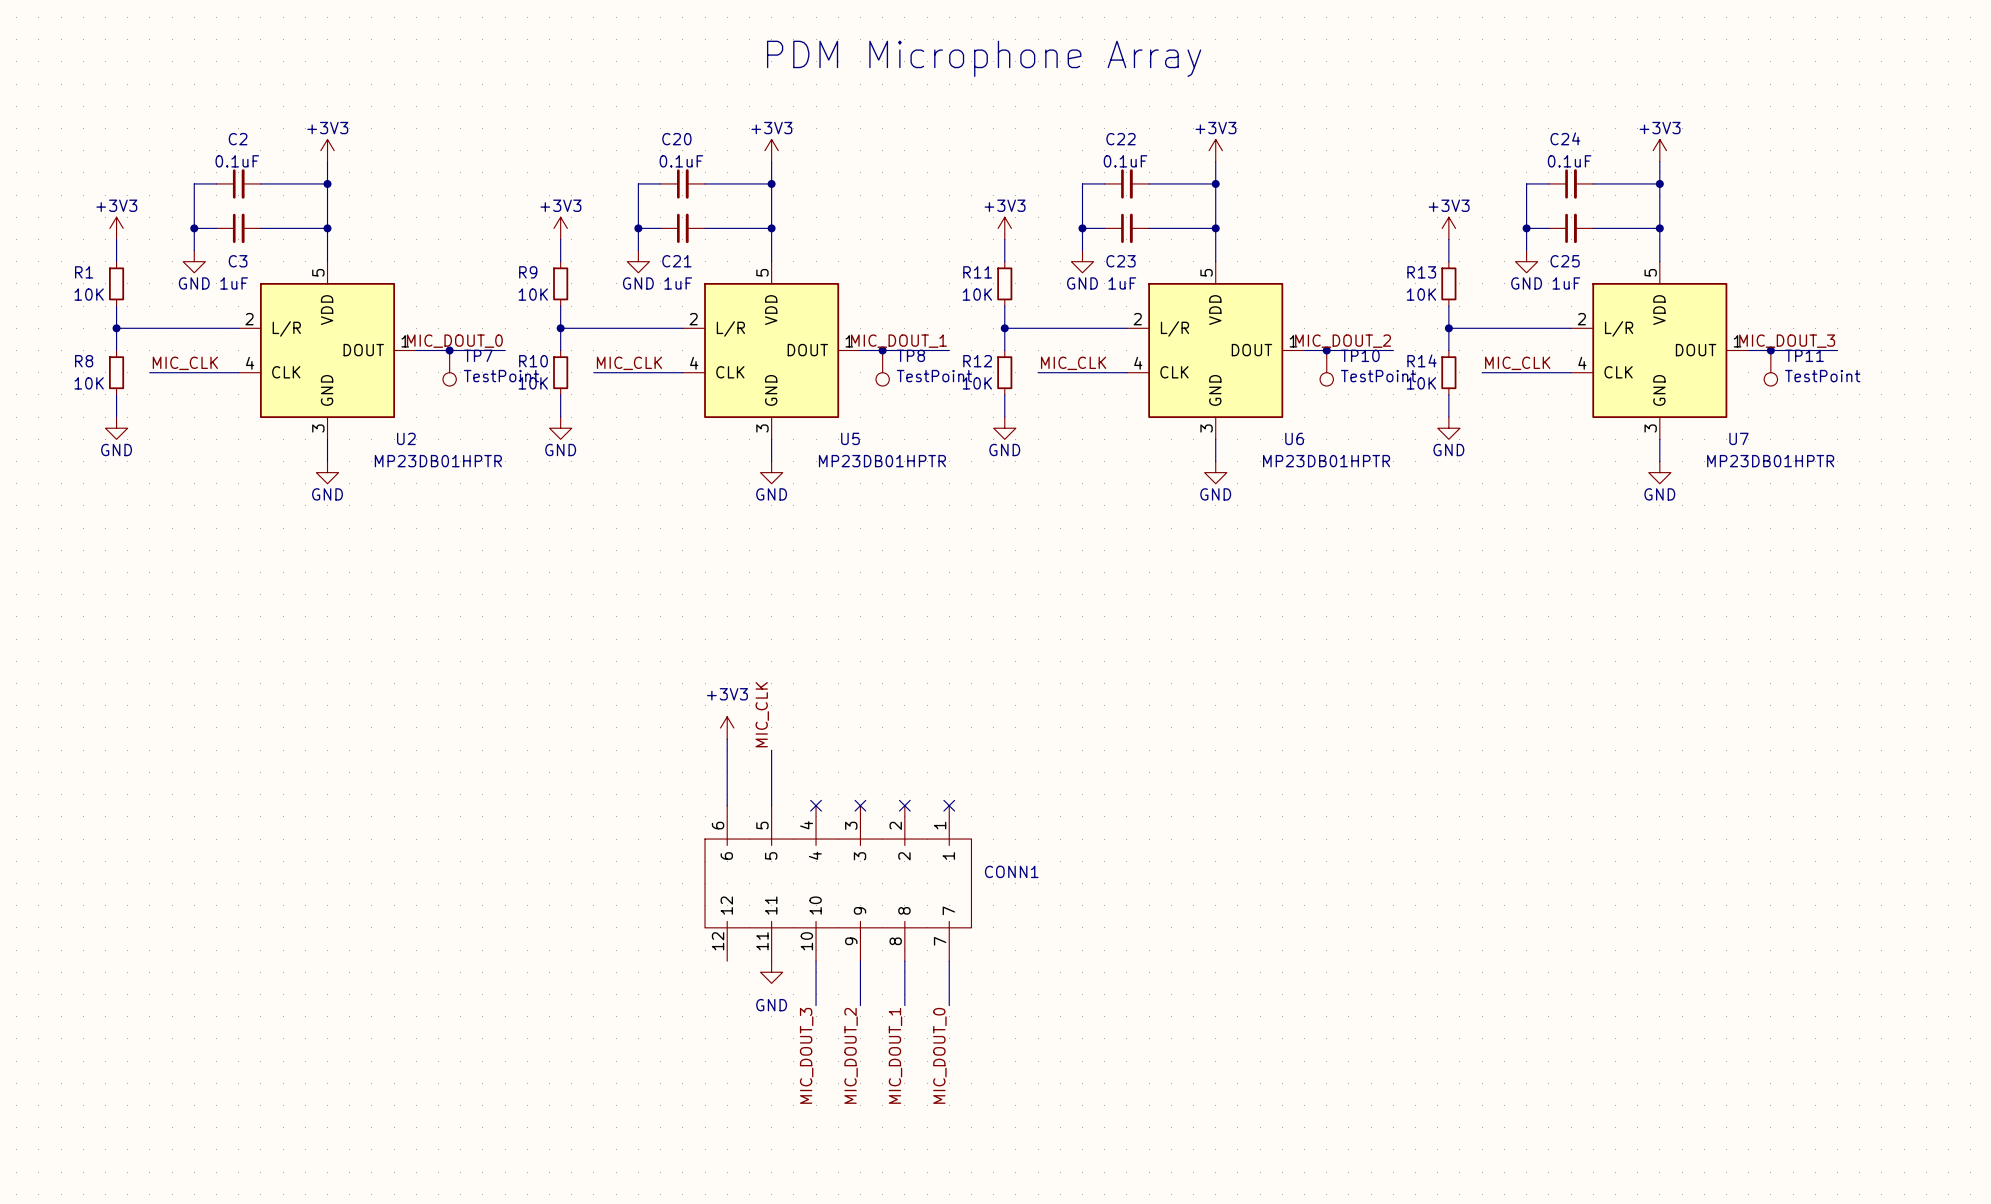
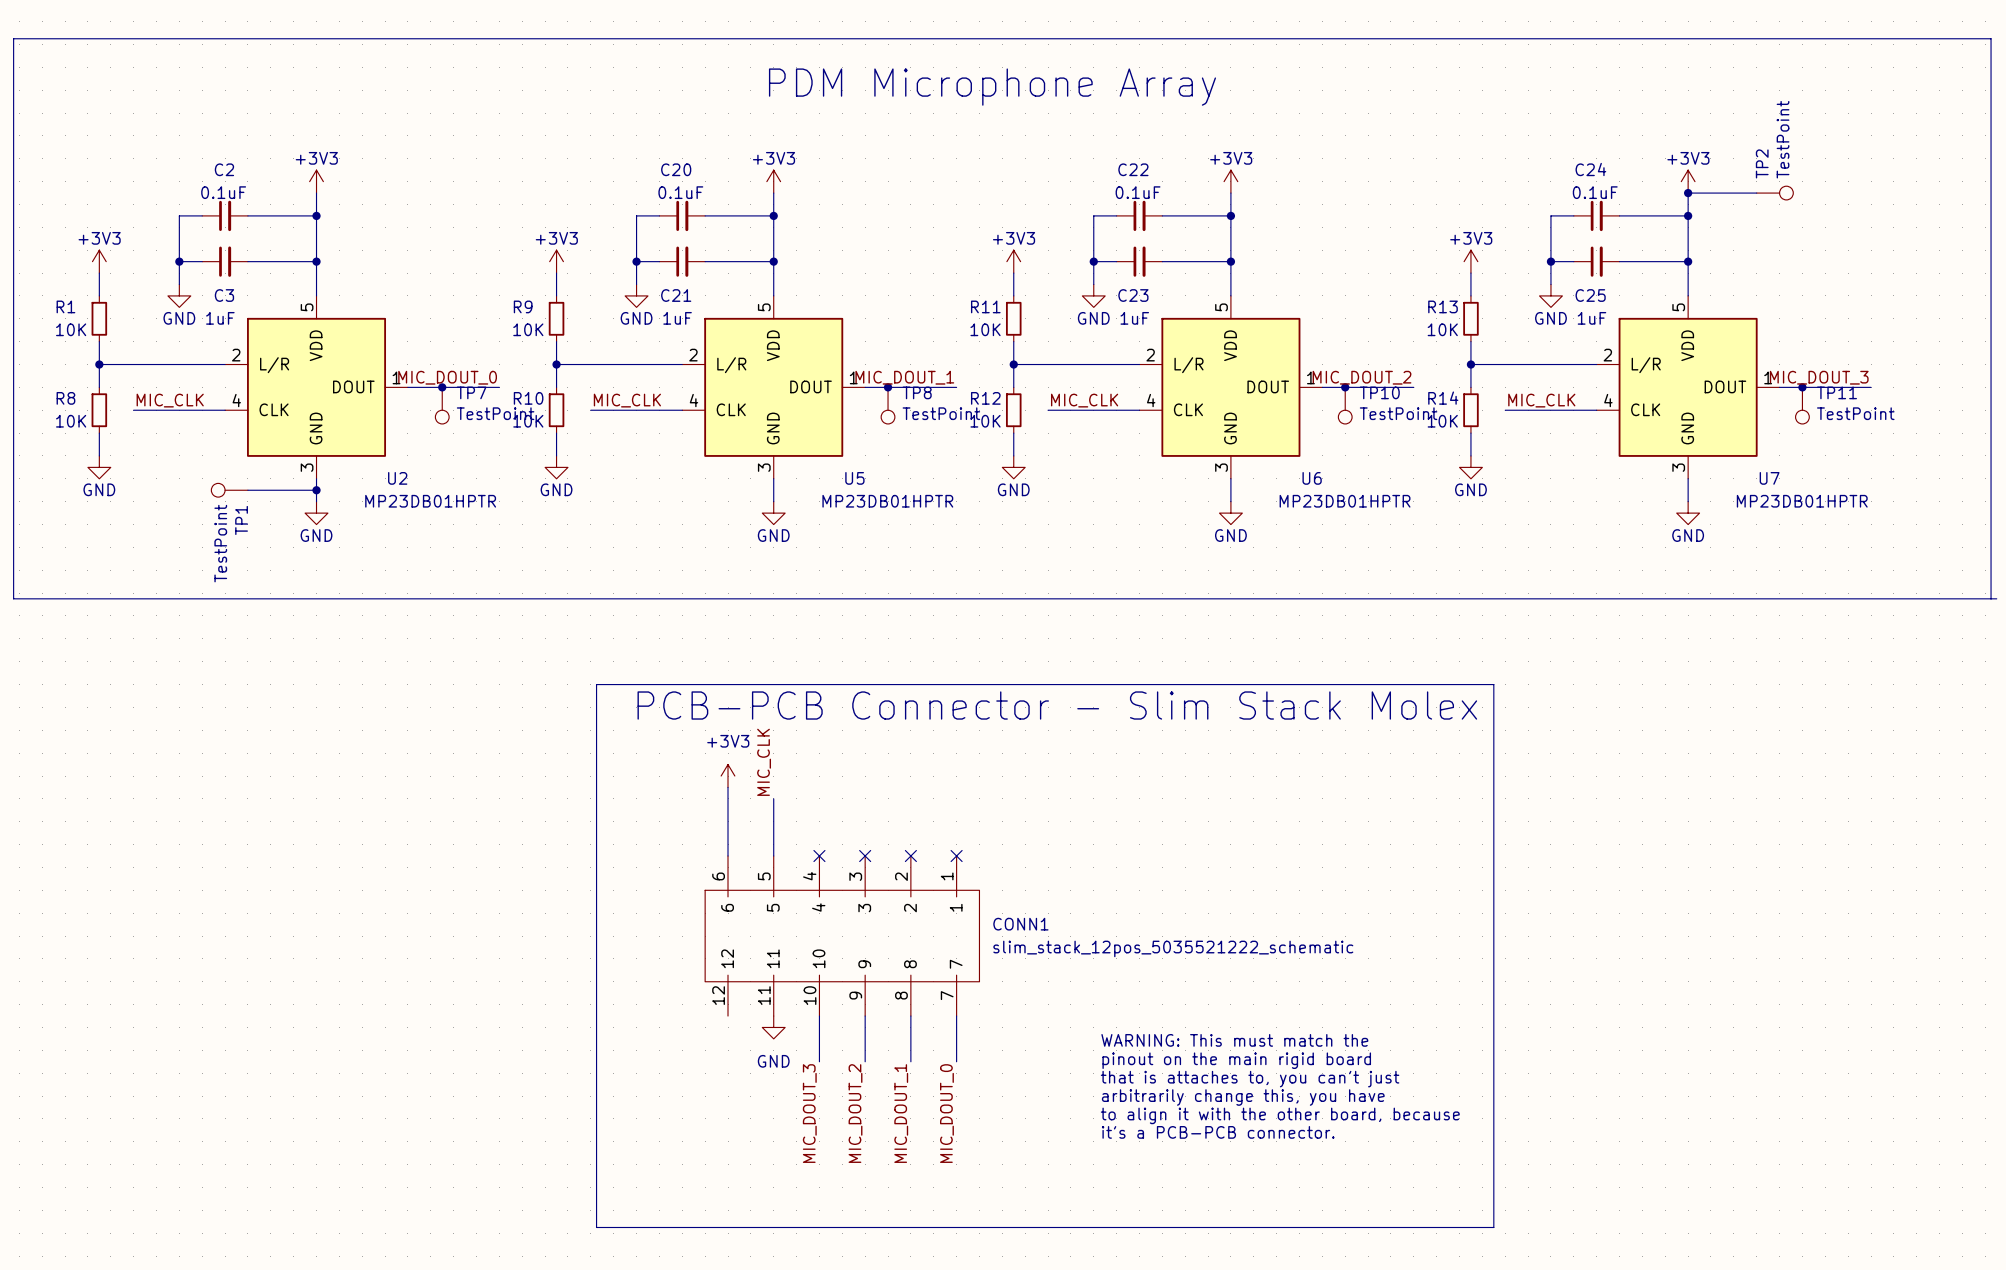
wire: none -> (1688, 193) (1756, 193)
junction: none -> (1688, 193)
TP2: none -> TestPoint (1775, 193)
TP1: none -> TestPoint (229, 490)
wire: none -> (247, 490) (316, 490)
junction: none -> (316, 490)
line: none -> (1991, 598) (1991, 38) (13, 38) (13, 598) (1996, 598)
line: none -> (596, 684) (1493, 684) (1493, 1227) (596, 1227) (596, 684)
text: none -> PCB-PCB Connector - Slim Stack Molex (1057, 705)
CONN1 value: none -> slim_stack_12pos_5035521222_schematic (1173, 948)
text: none -> WARNING: This must match the (1234, 1040)
text: none -> pinout on the main rigid board (1236, 1060)
text: none -> that is attaches to, you can't just (1250, 1079)
text: none -> arbitrarily change this, you have (1243, 1097)
text: none -> to align it with the other board, because (1280, 1115)
text: none -> it's a PCB-PCB connector. (1218, 1132)

